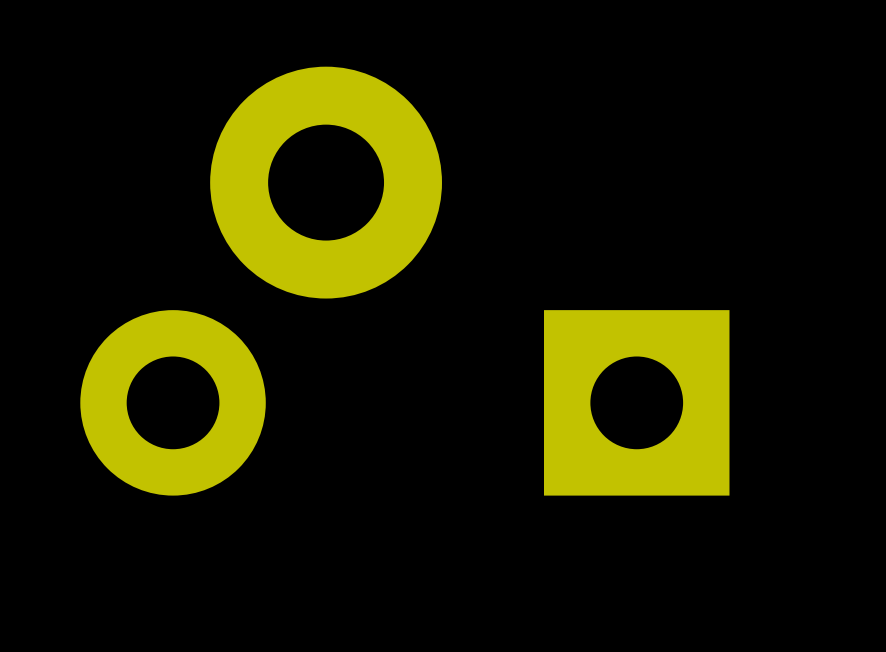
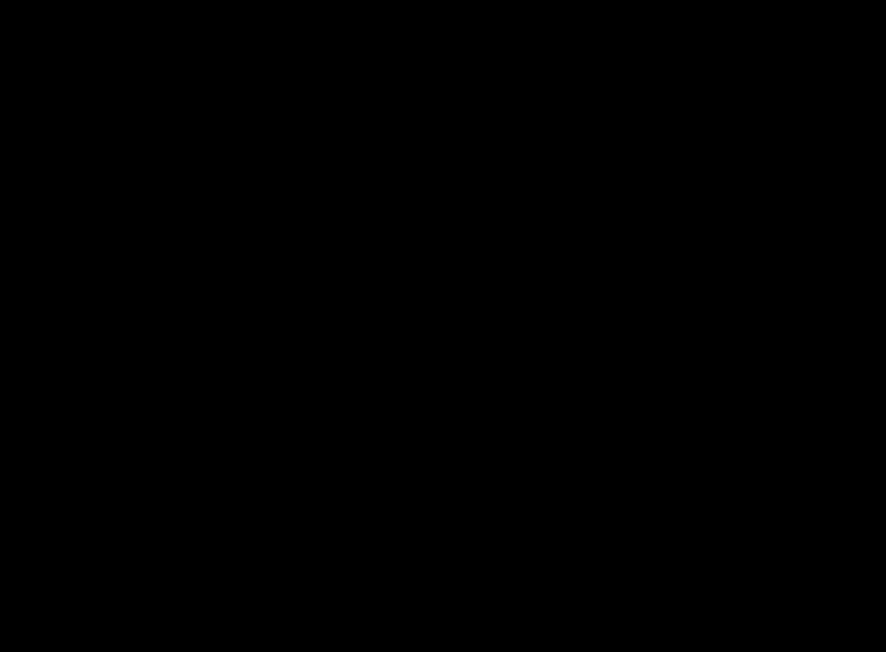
part: (404, 281) -> none

